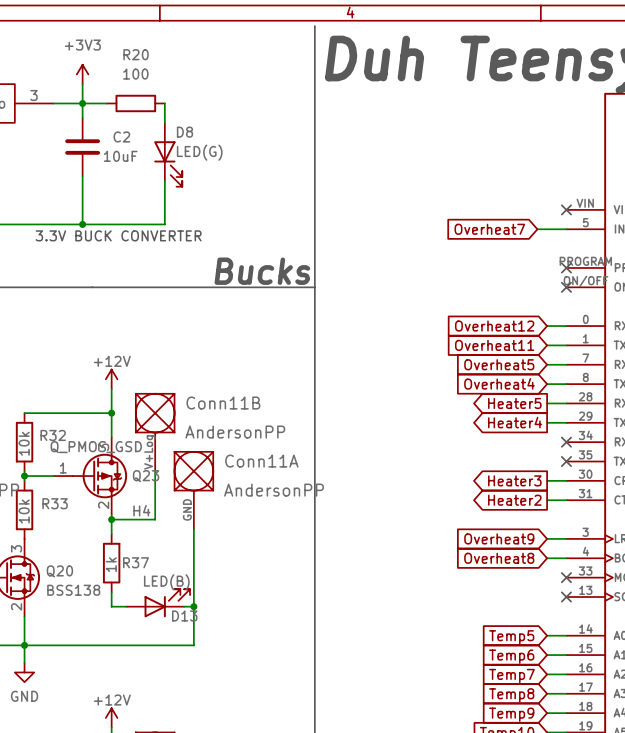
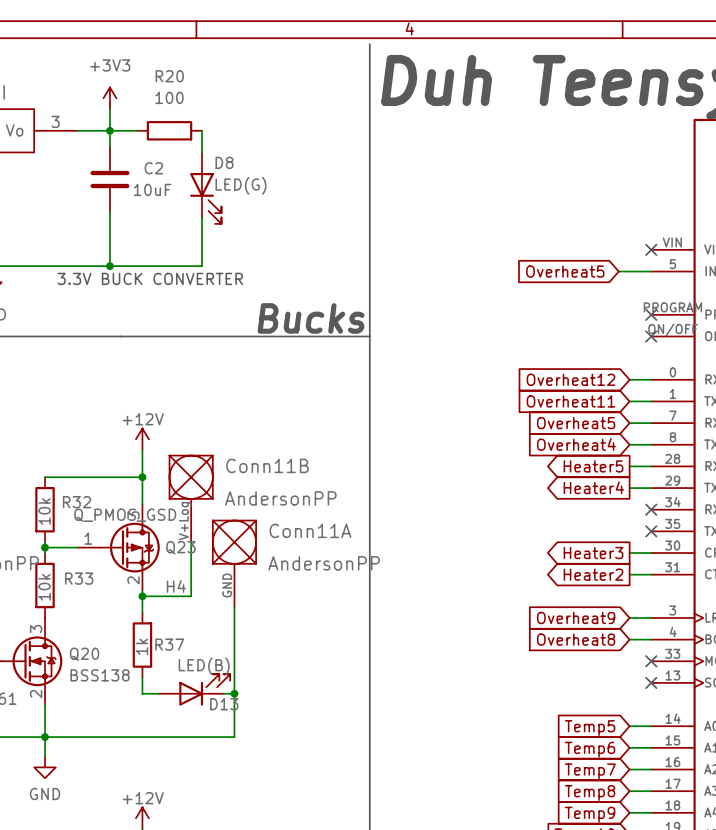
global label: Overheat7 (489, 229) -> Overheat5 (565, 271)

